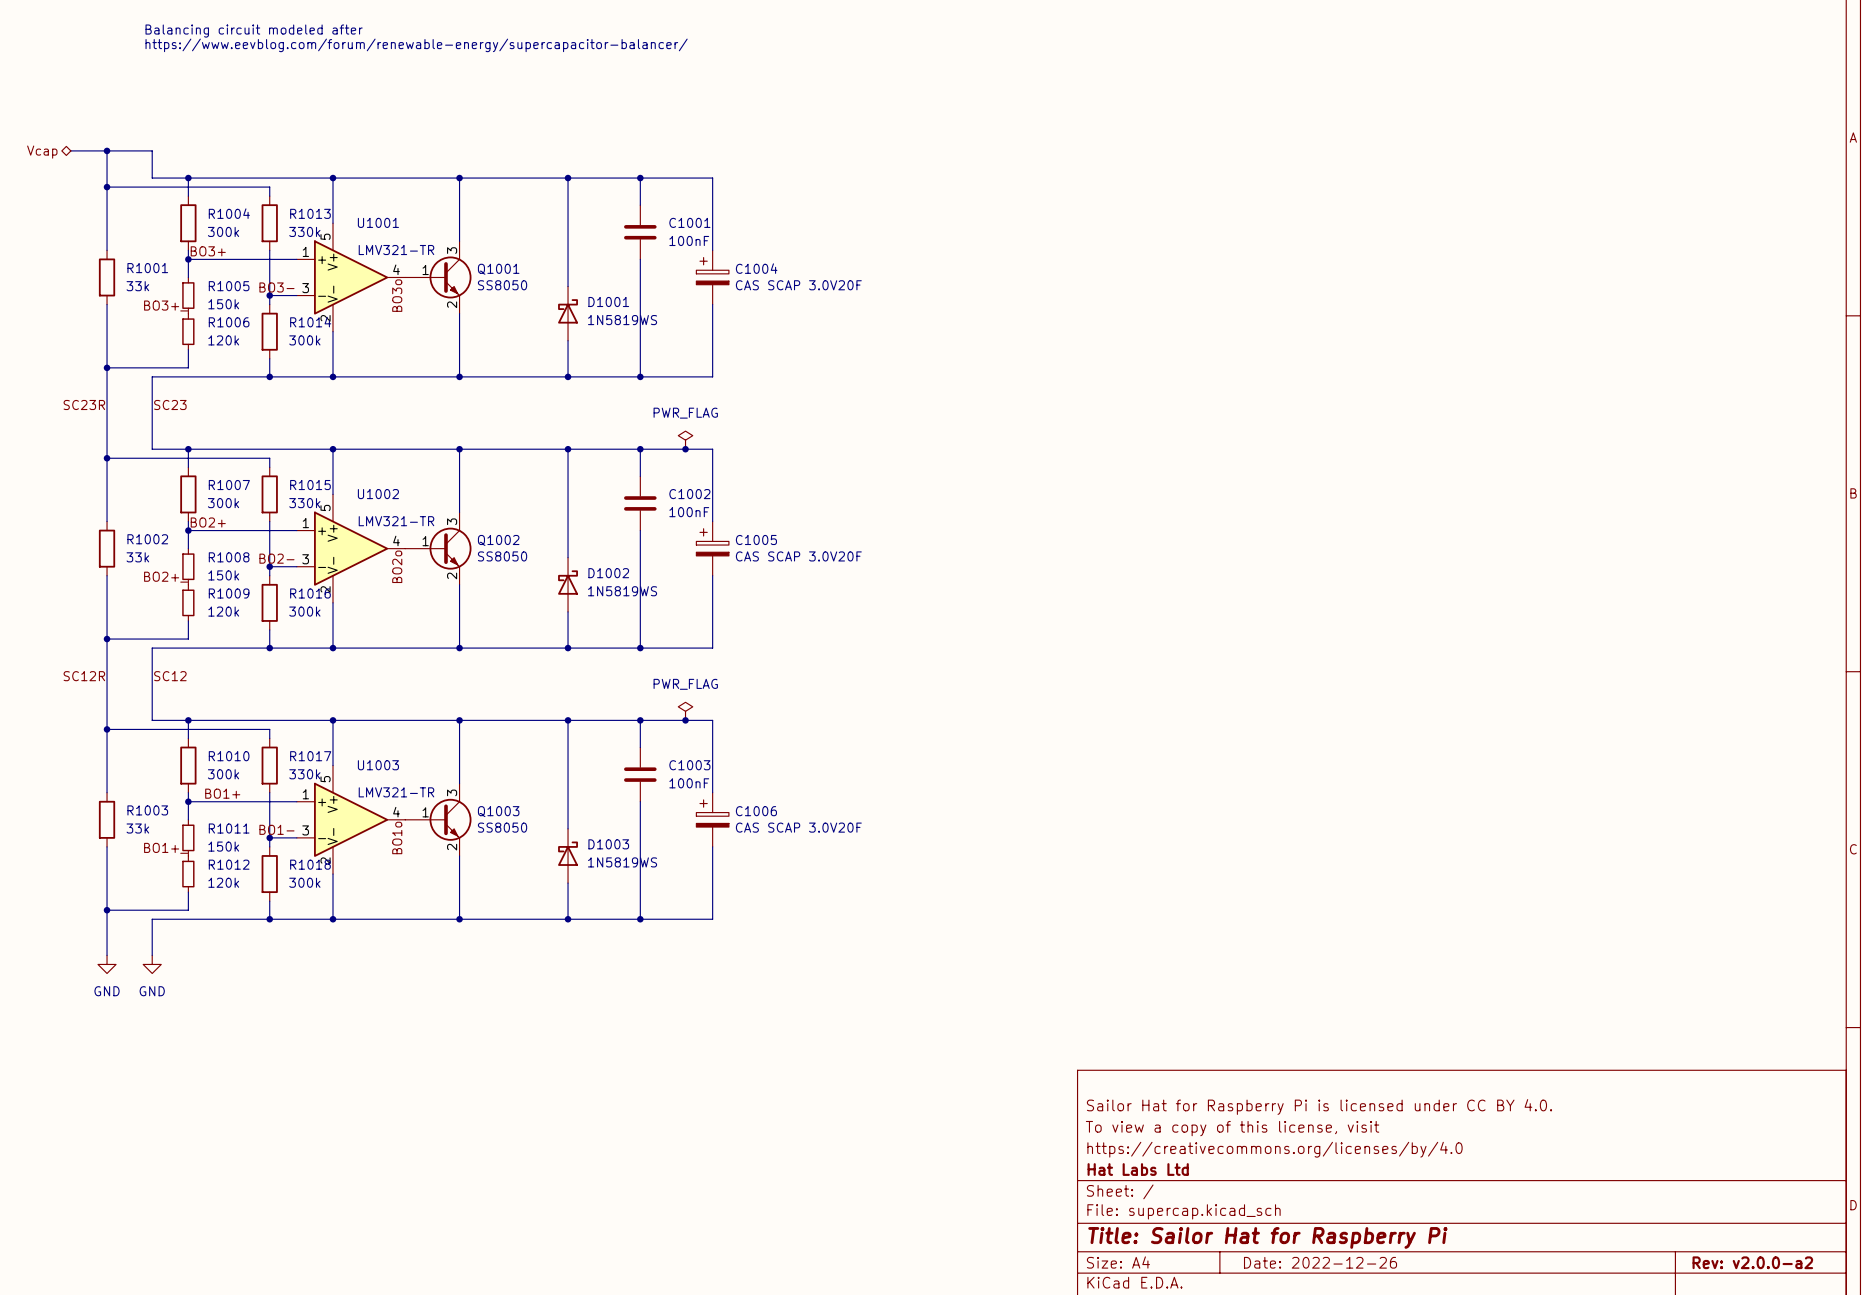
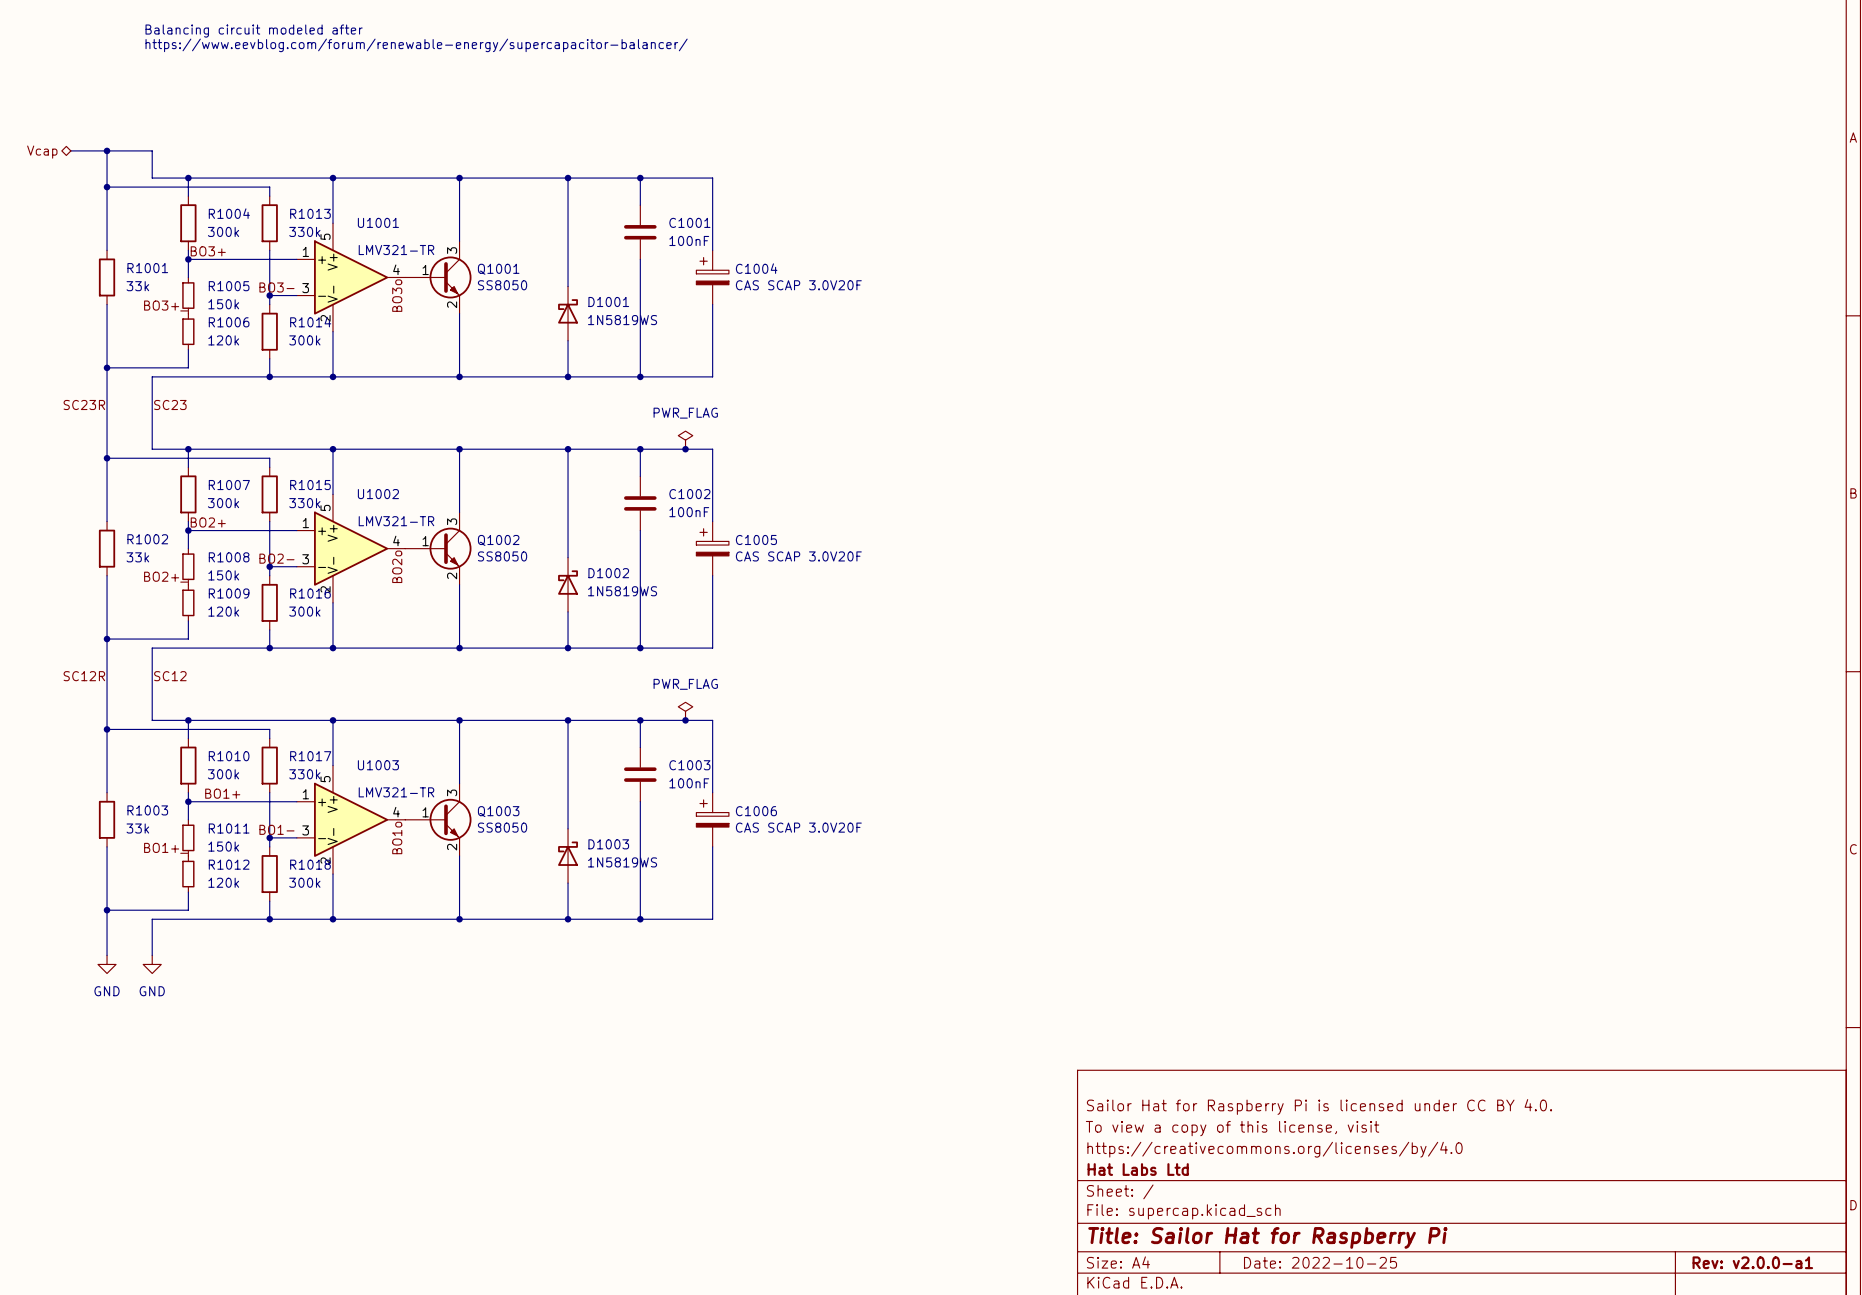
title block: Date: 2022-12-26 (1320, 1262) -> Date: 2022-10-25 (1320, 1262)
title block: Rev: v2.0.0-a2 (1752, 1262) -> Rev: v2.0.0-a1 (1752, 1262)

